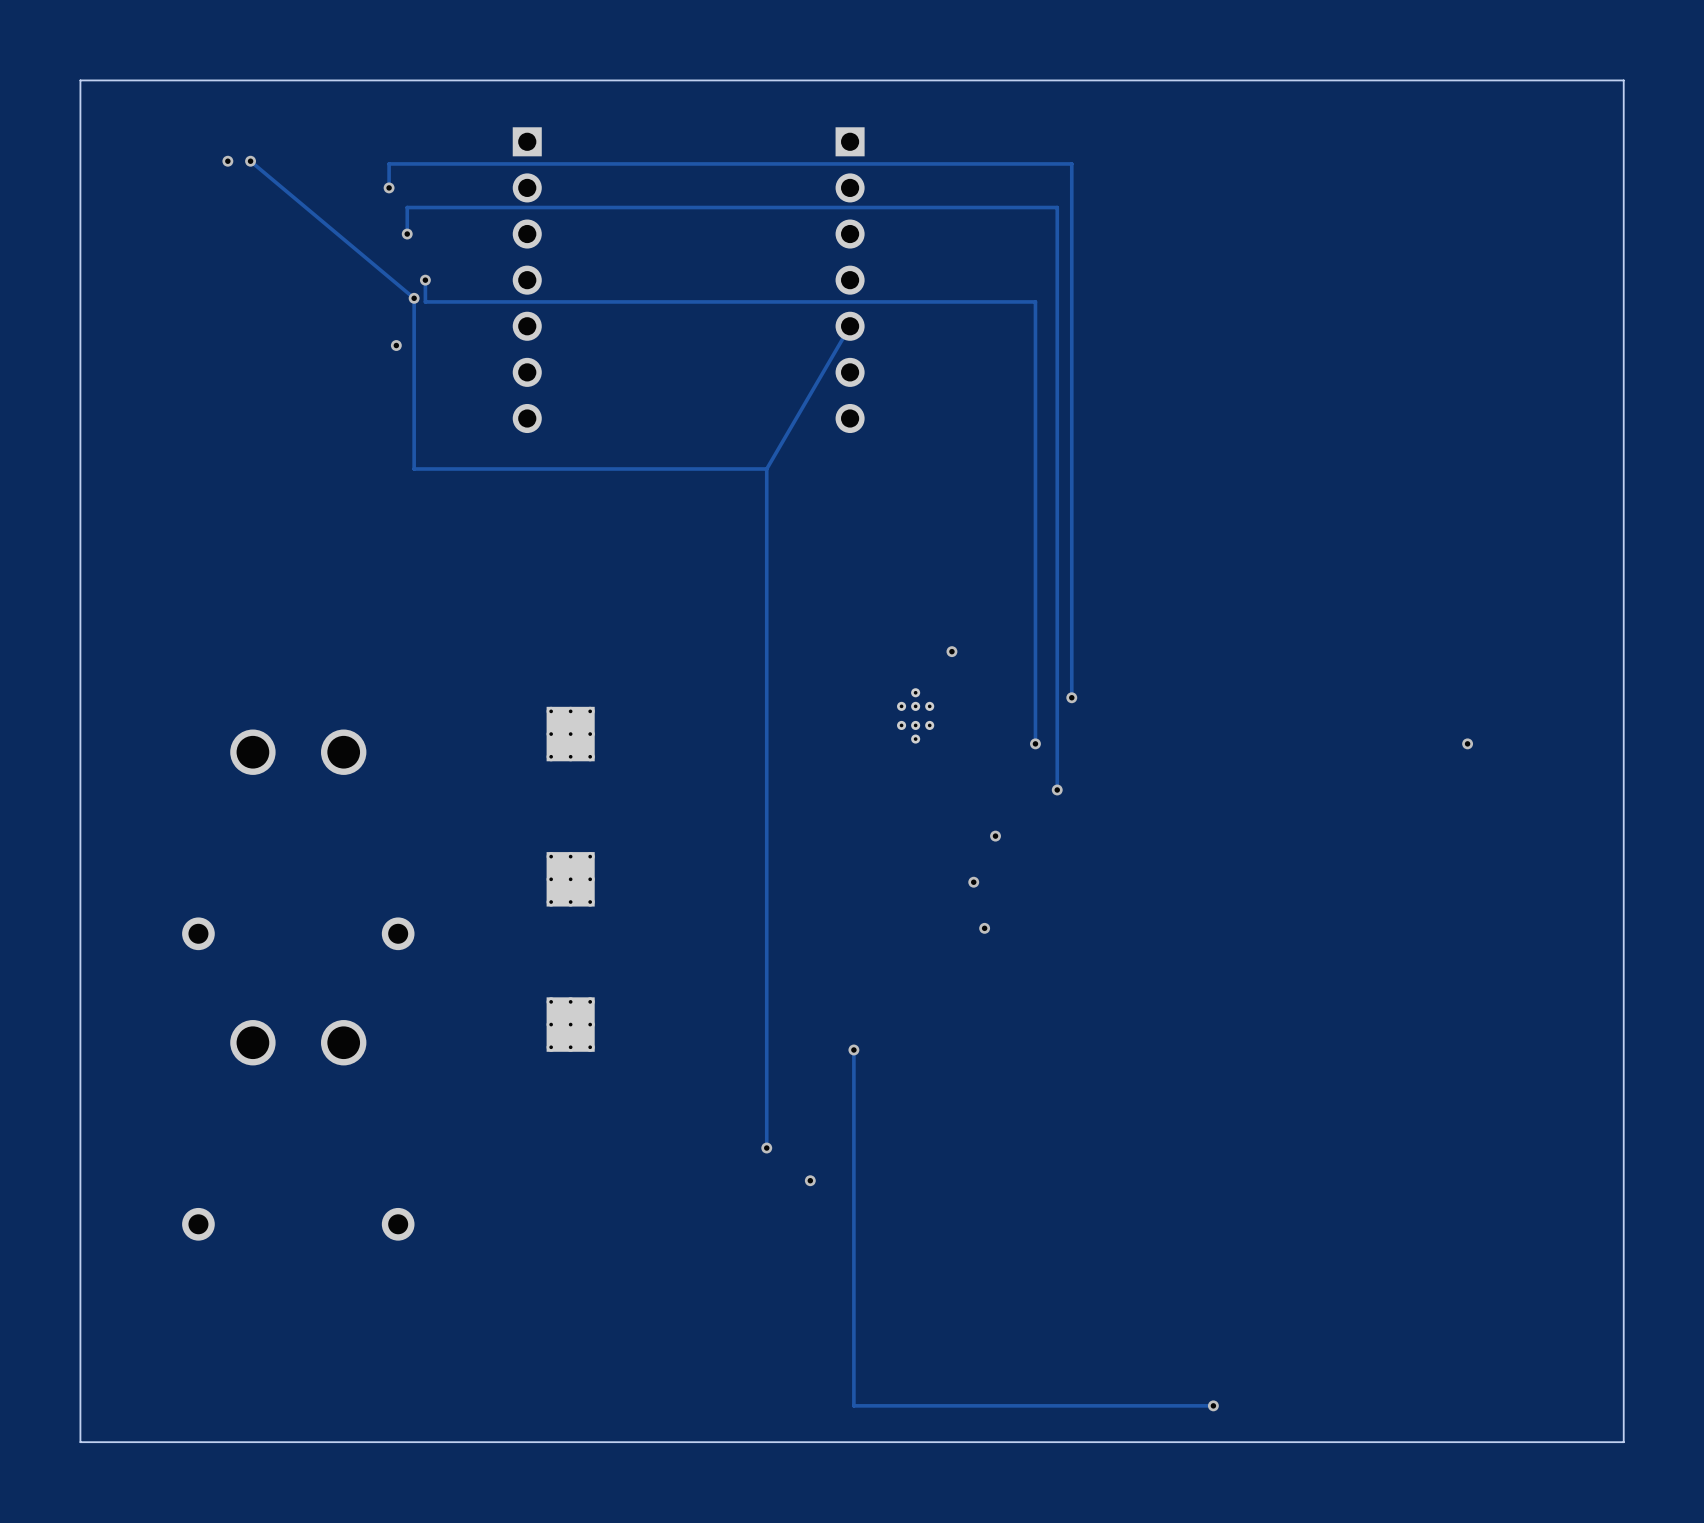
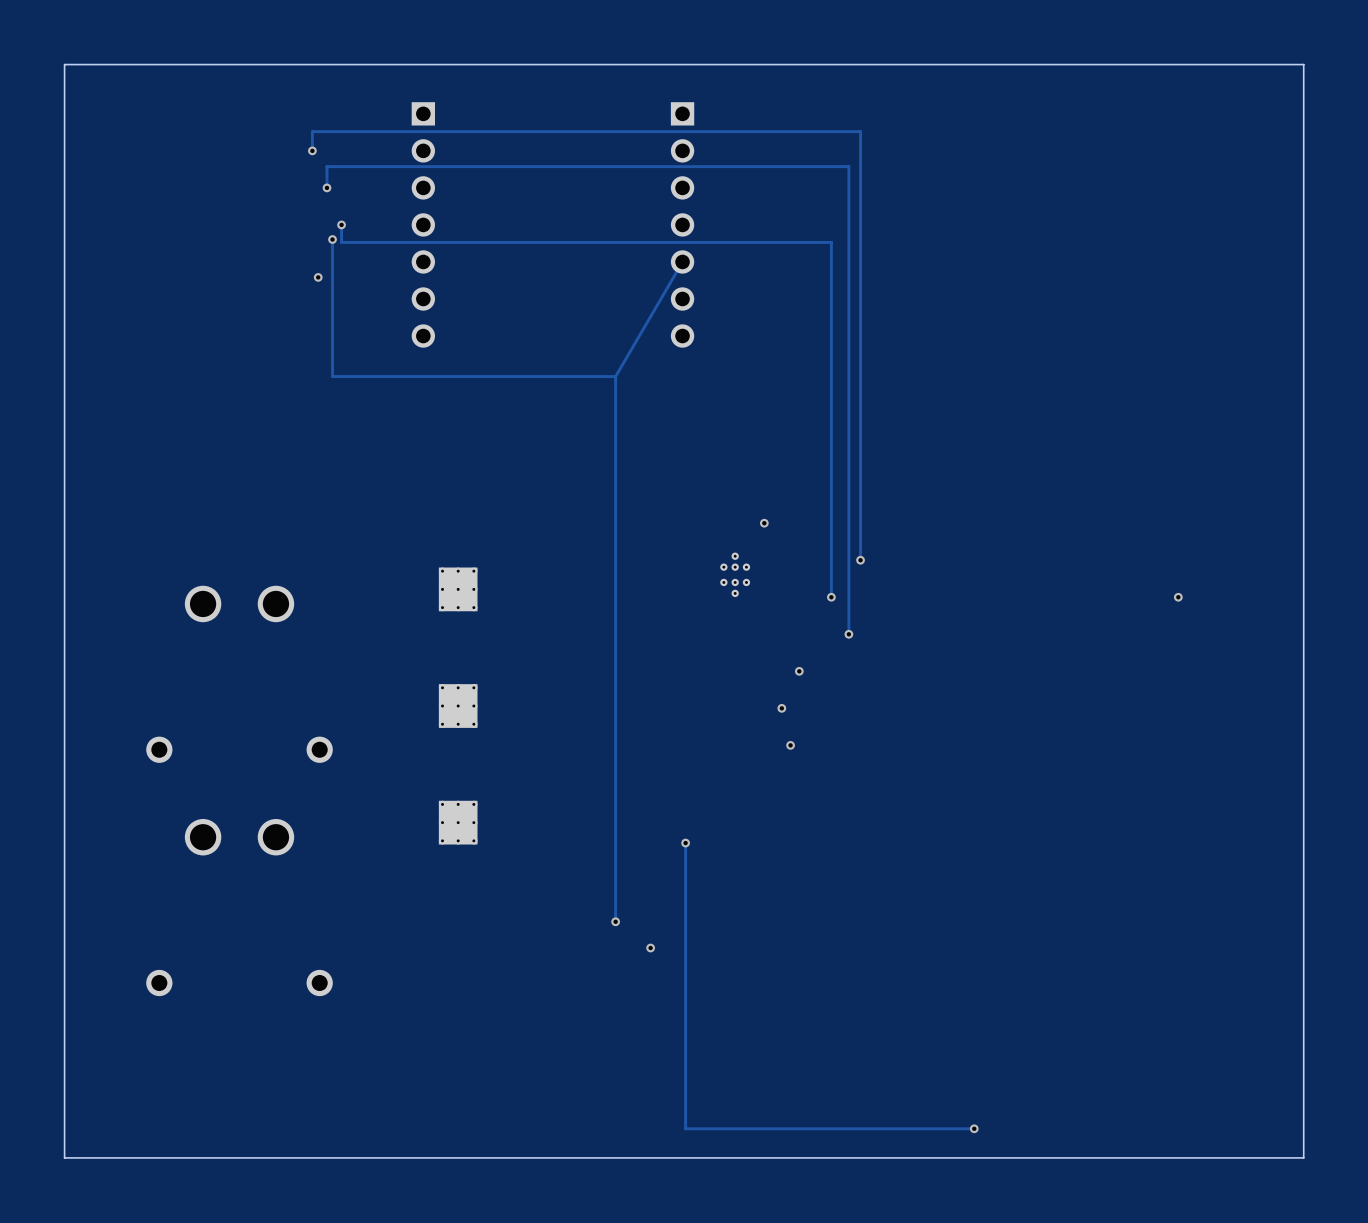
via: (227, 161) -> none
track: (250, 161) (414, 298) -> none
via: (250, 161) -> none

